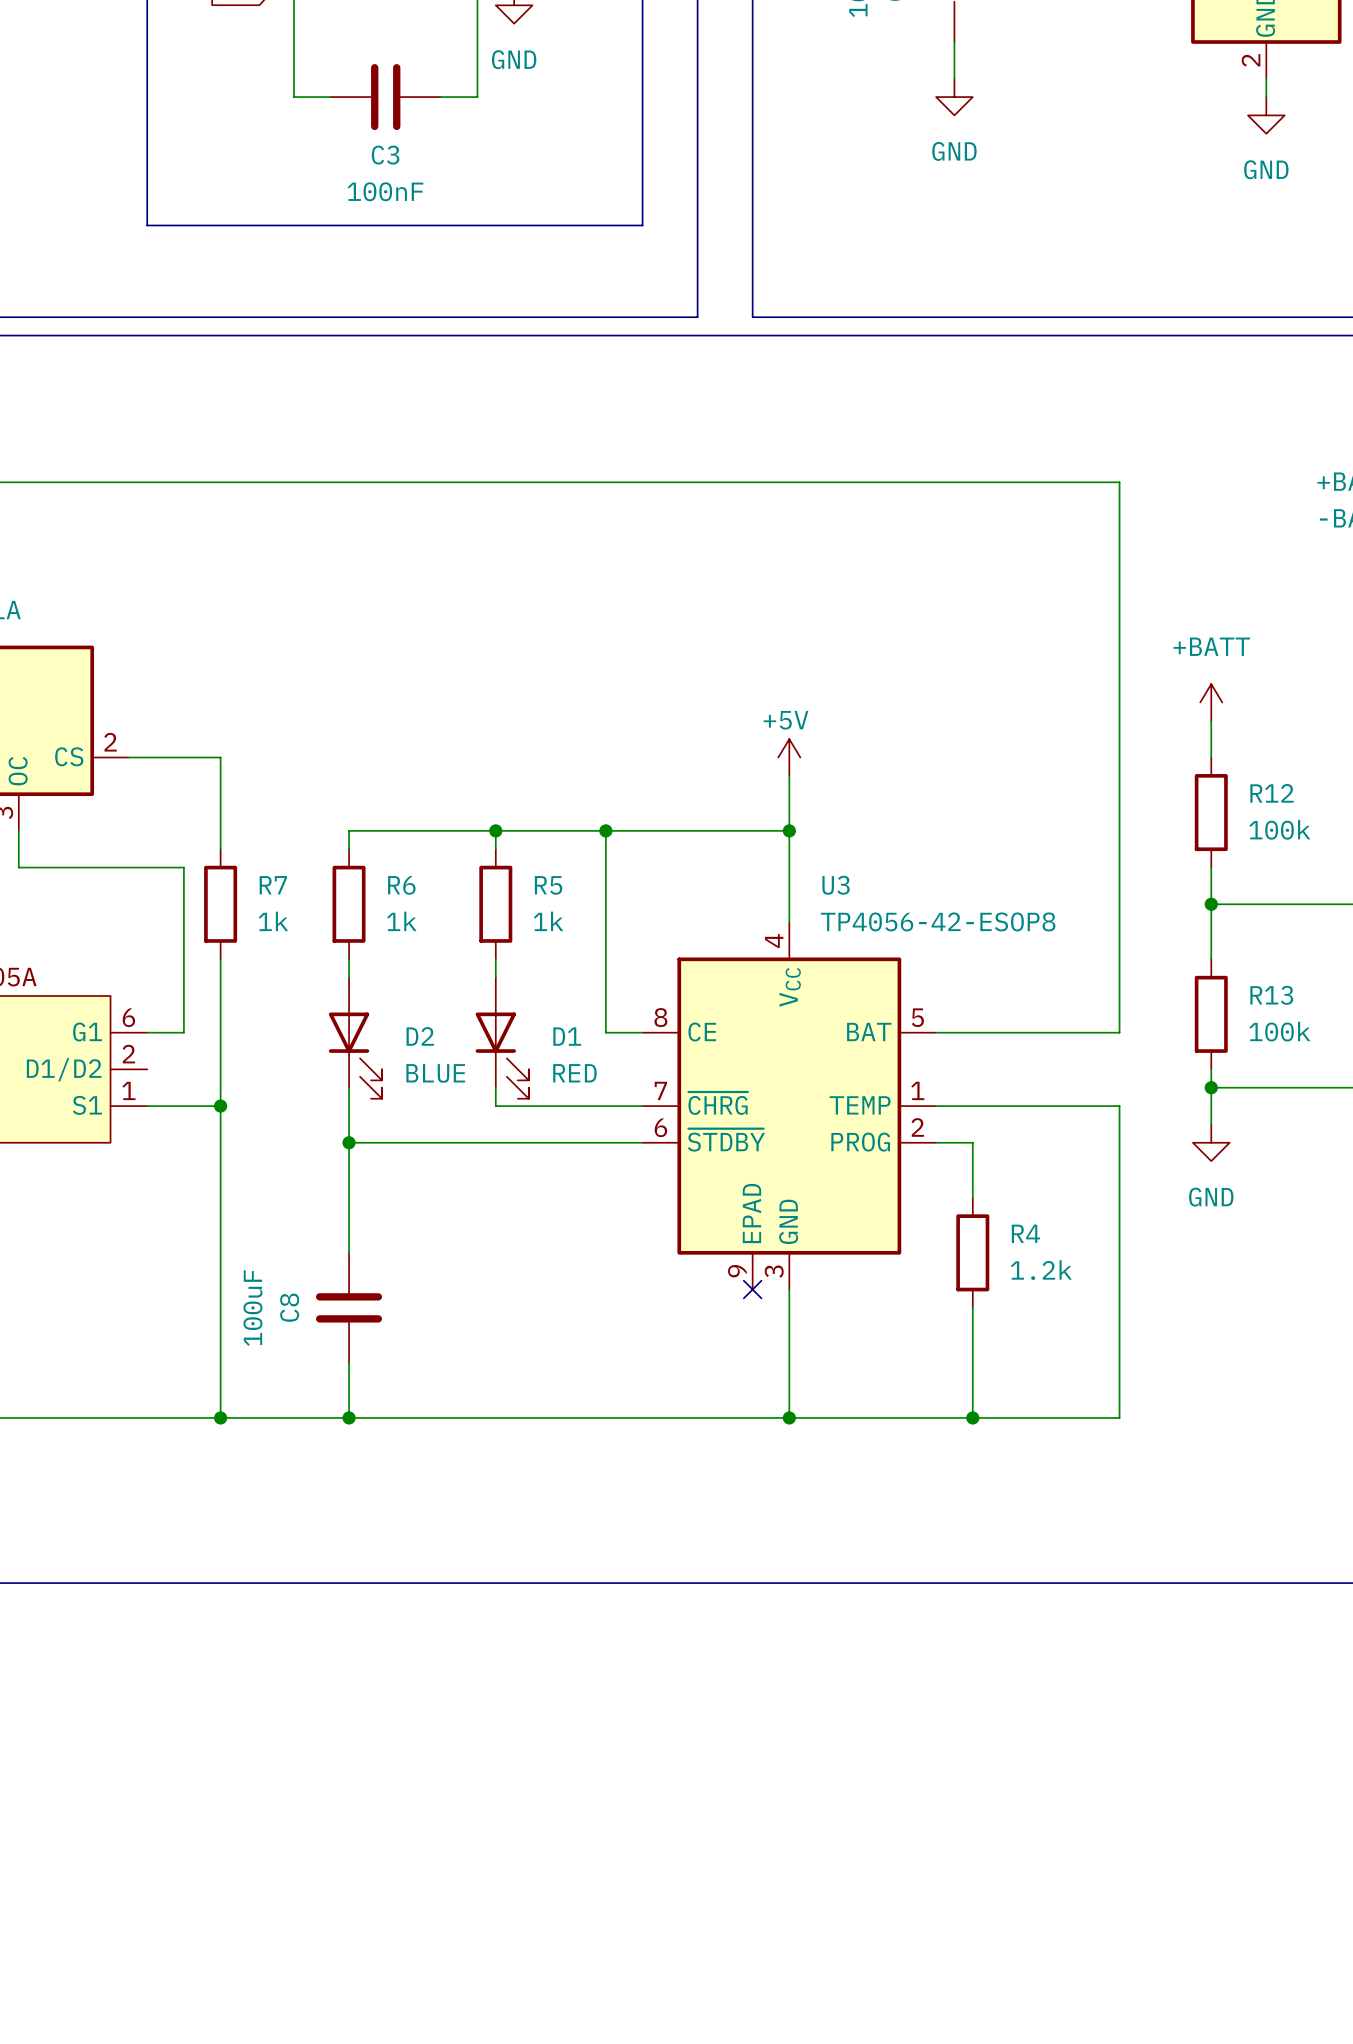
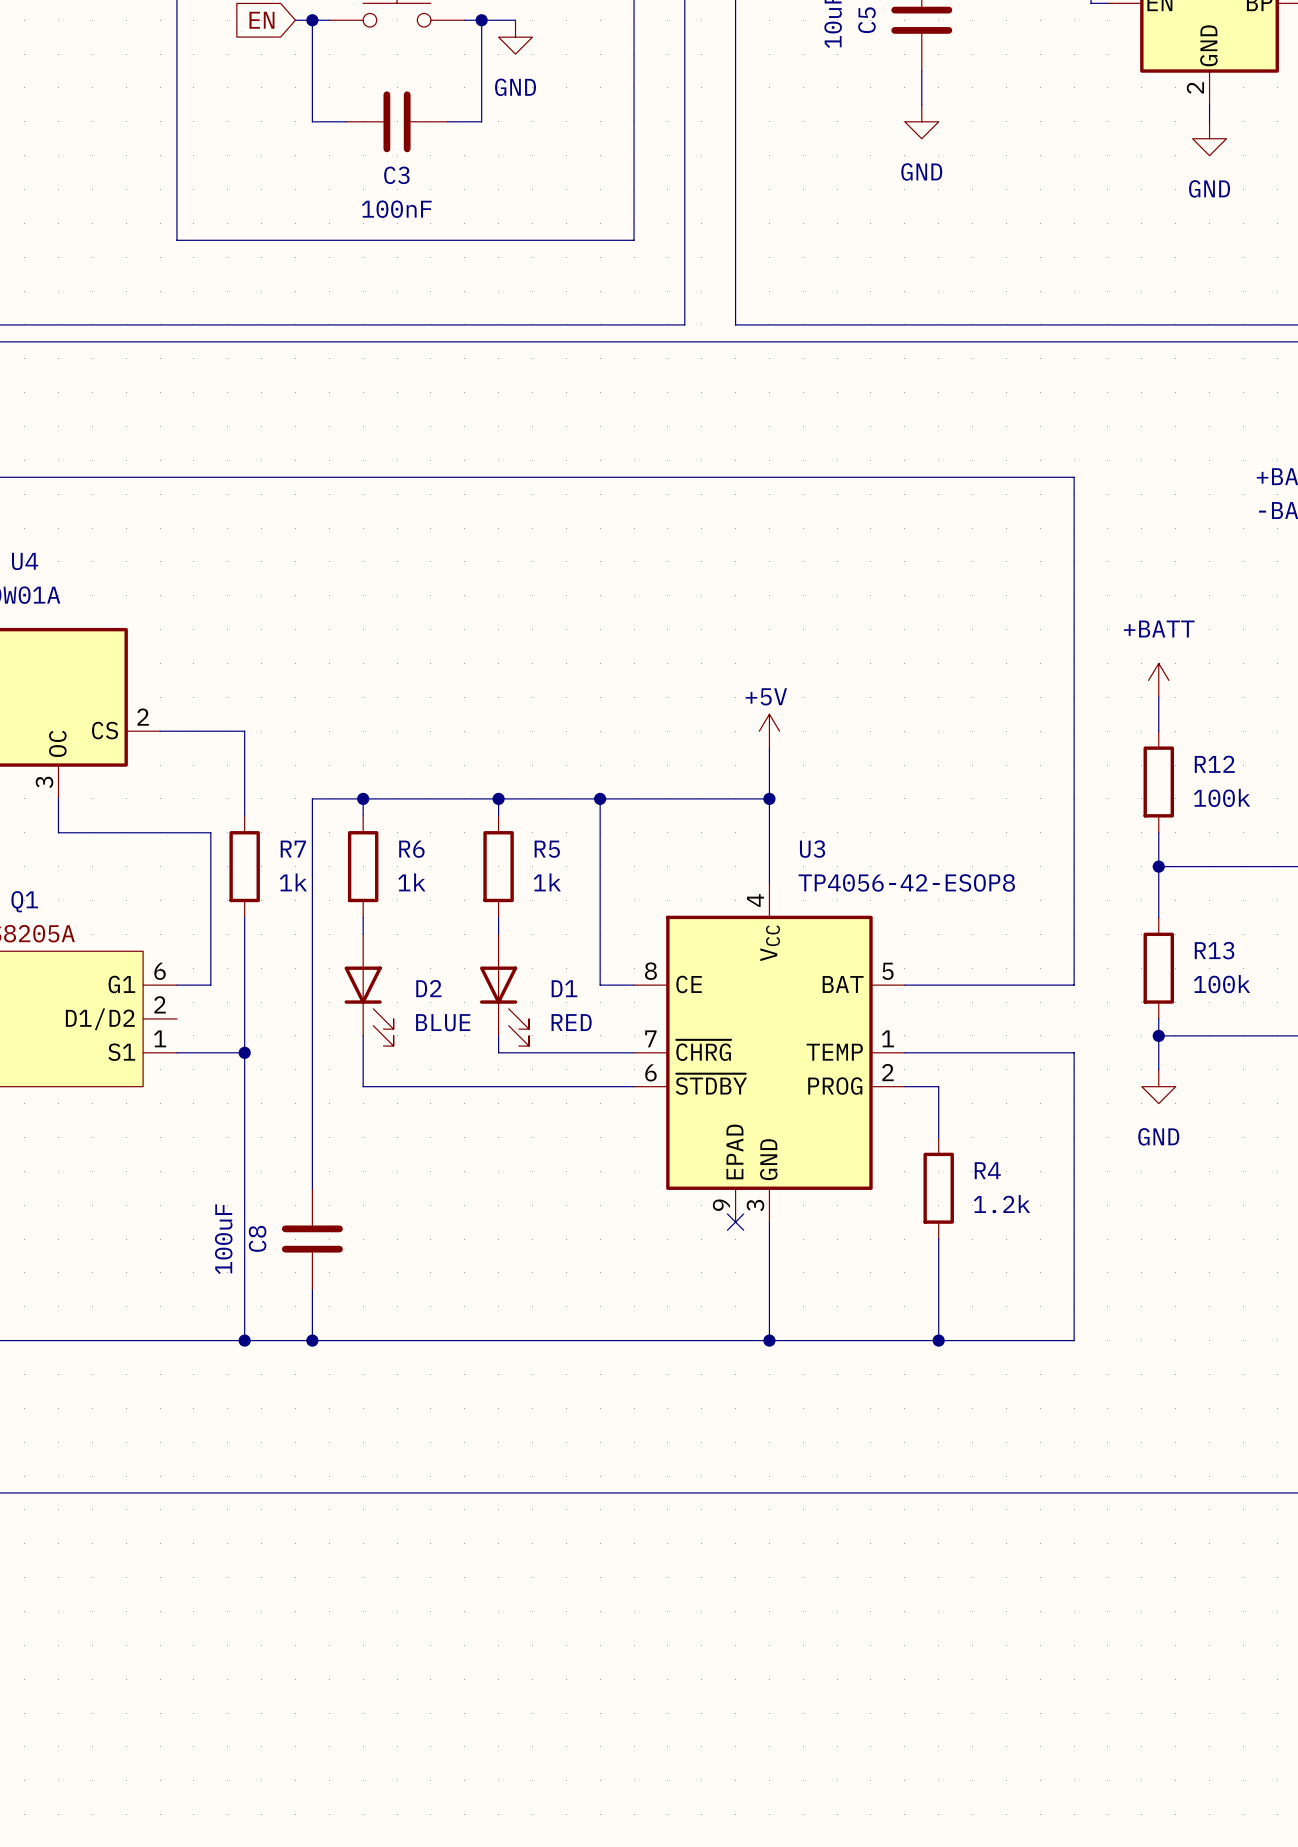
wire: none -> (363, 798) (312, 798) (312, 1188)
junction: none -> (363, 798)
wire: (349, 1142) (349, 1252) -> none
junction: (349, 1142) -> none
C8 position: (349, 1307) -> (312, 1239)
wire: (349, 1362) (349, 1417) -> (312, 1289) (312, 1340)
junction position: (349, 1417) -> (312, 1340)

